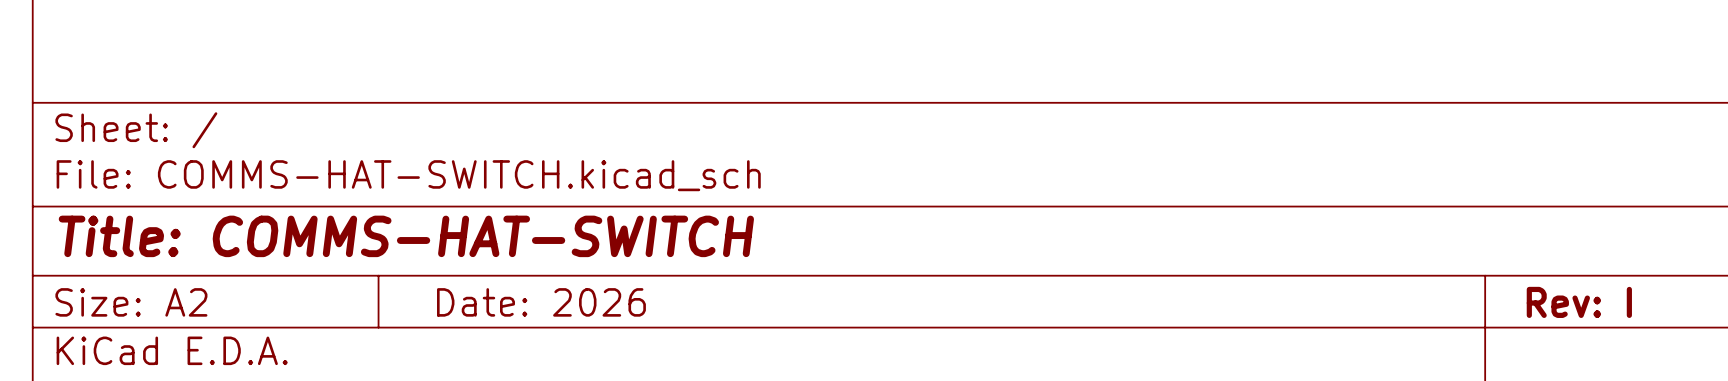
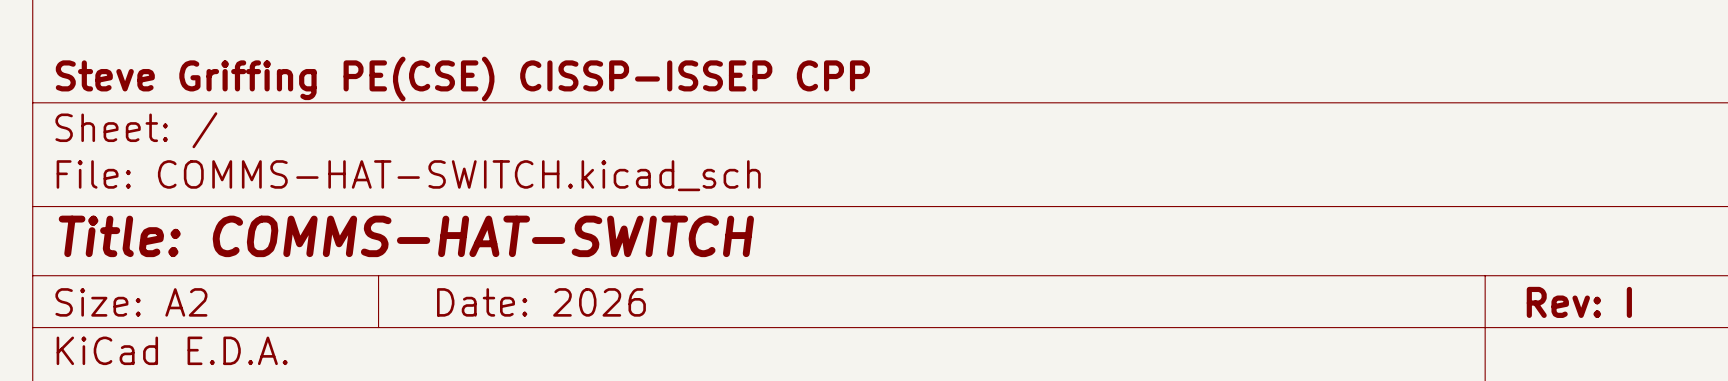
title block: none -> Steve Griffing PE(CSE) CISSP-ISSEP CPP (462, 78)

